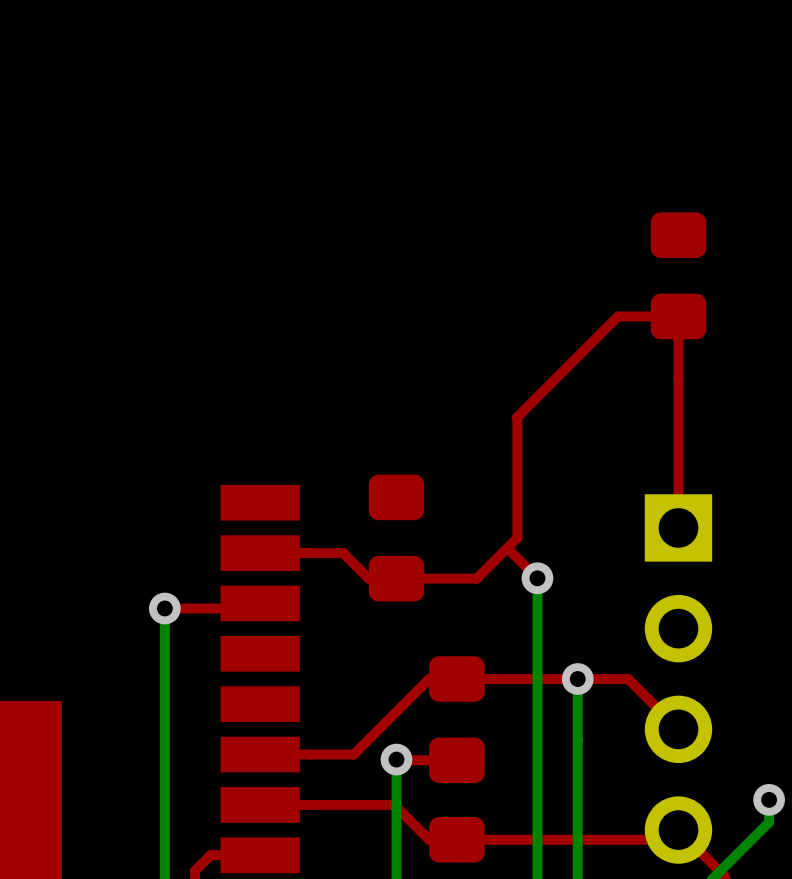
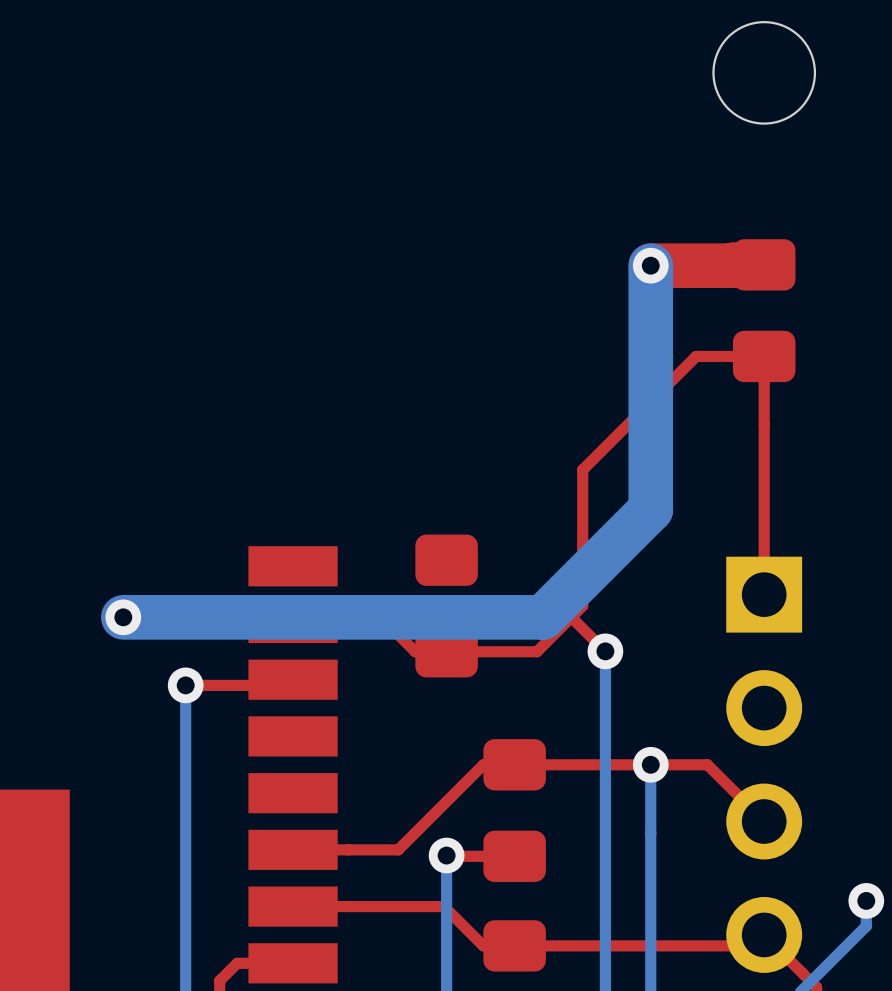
round board edge: none -> [712, 21, 817, 125]
bottom track: none -> (650, 265) (650, 509) (543, 617) (123, 617)
via: none -> (650, 265)
top track: none -> (764, 264) (650, 265)
via: none -> (123, 617)

